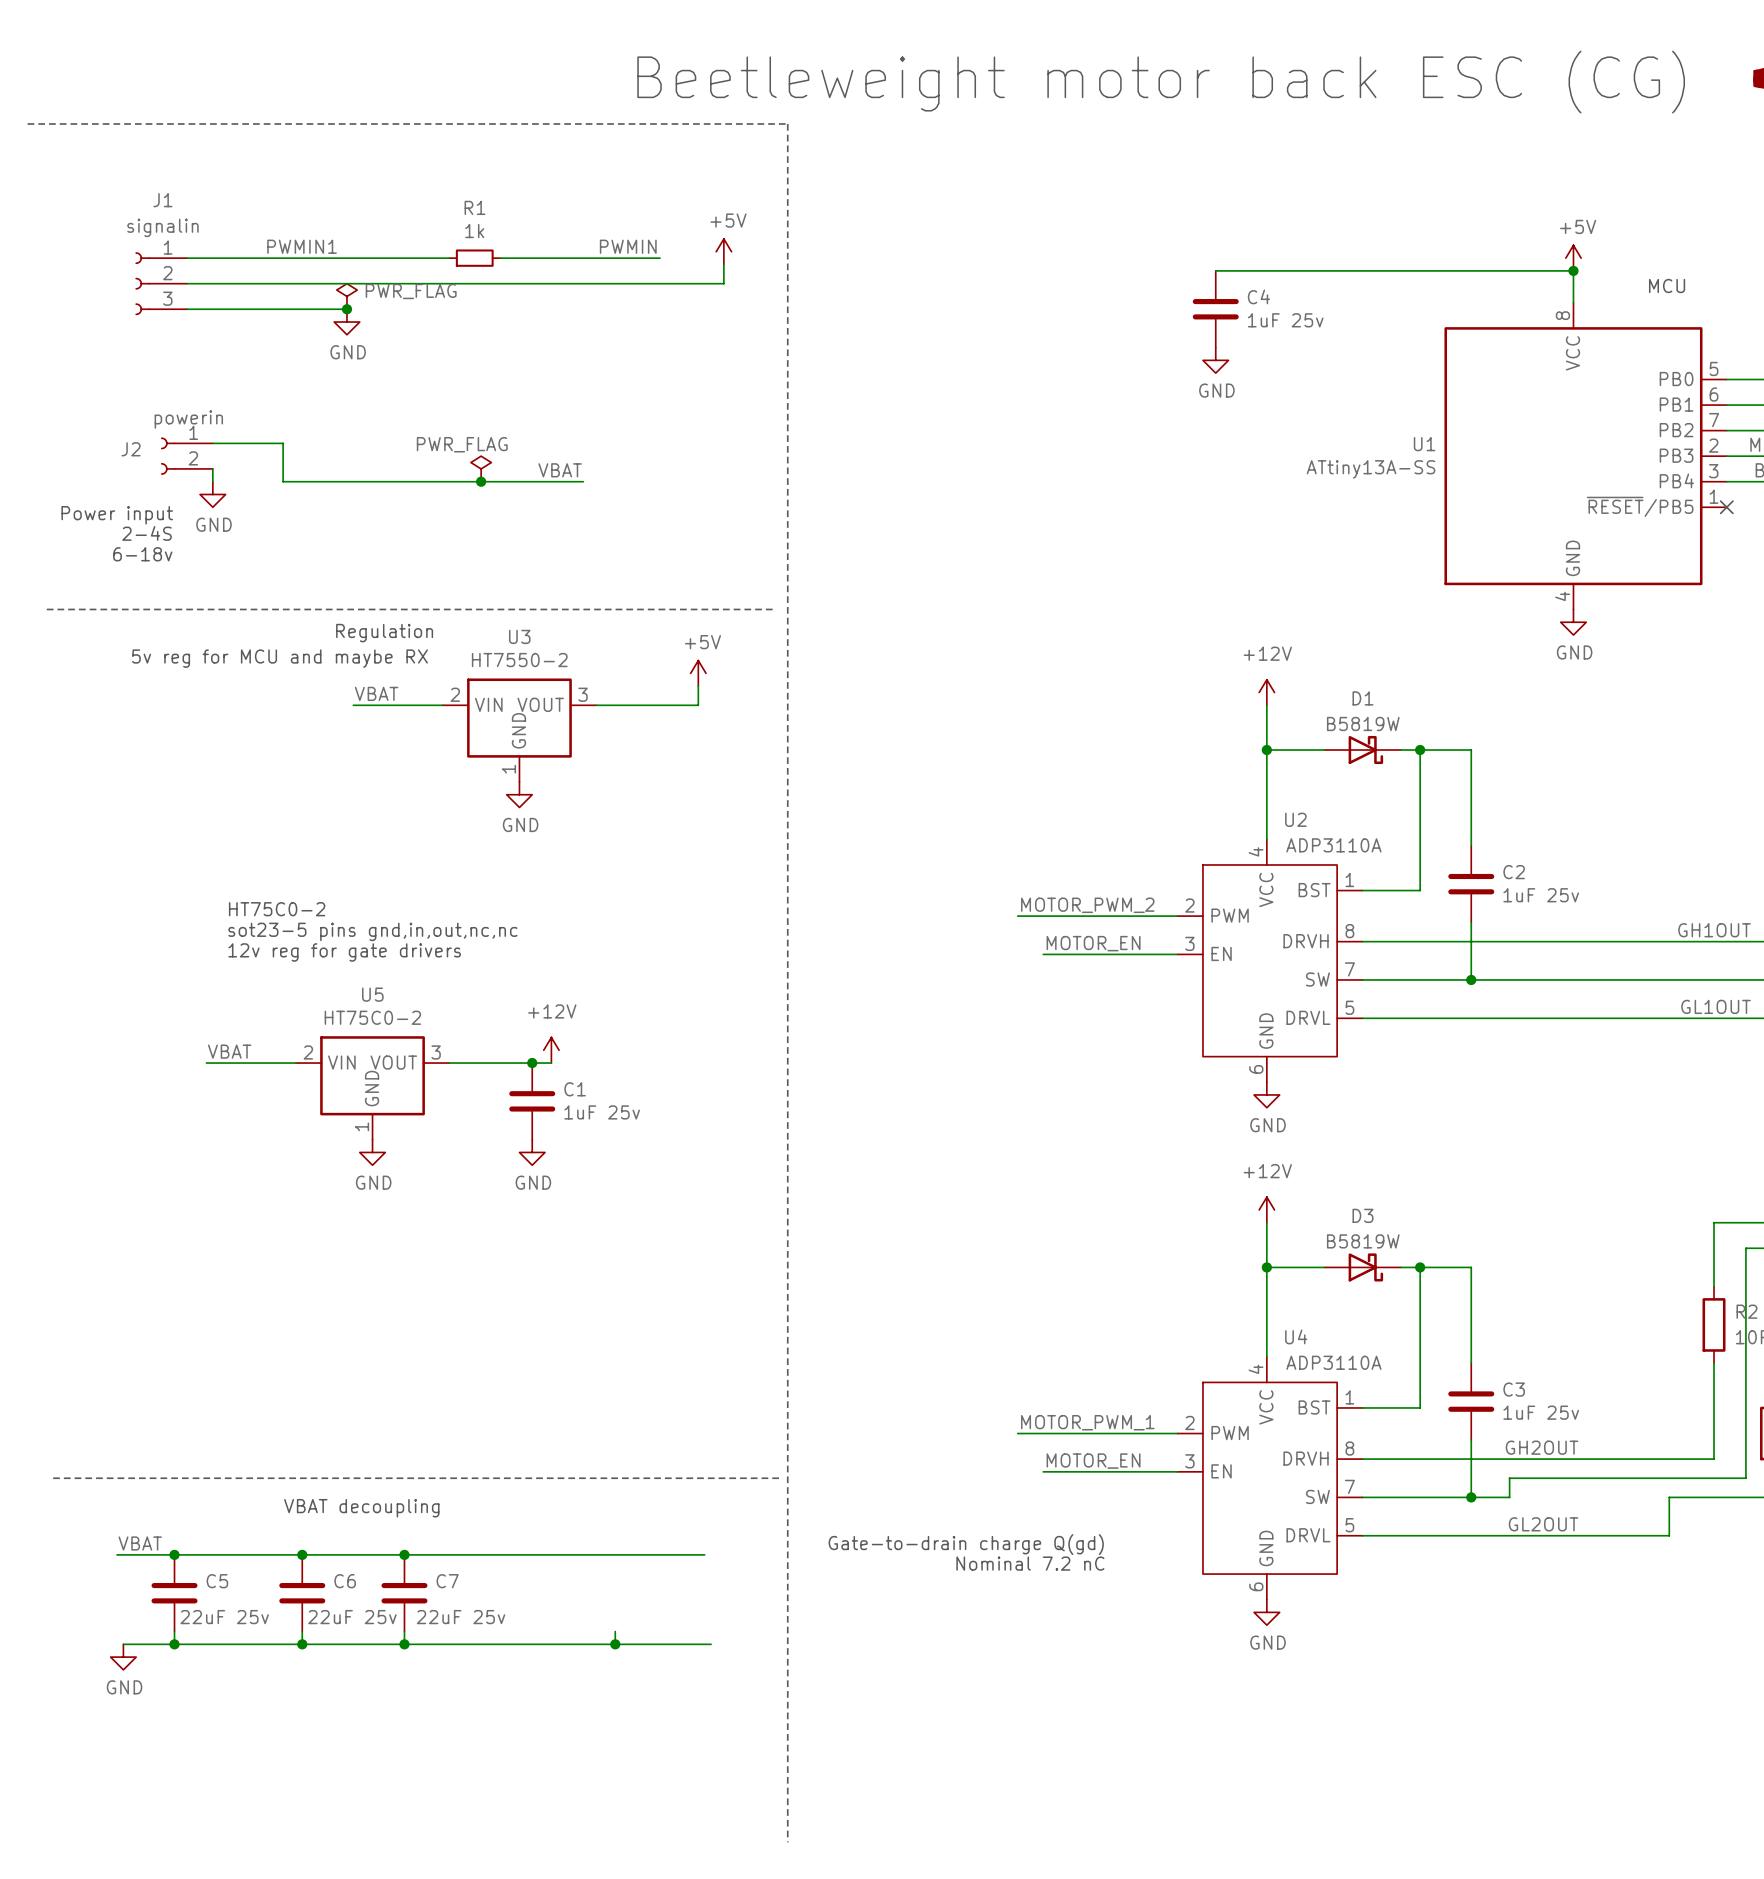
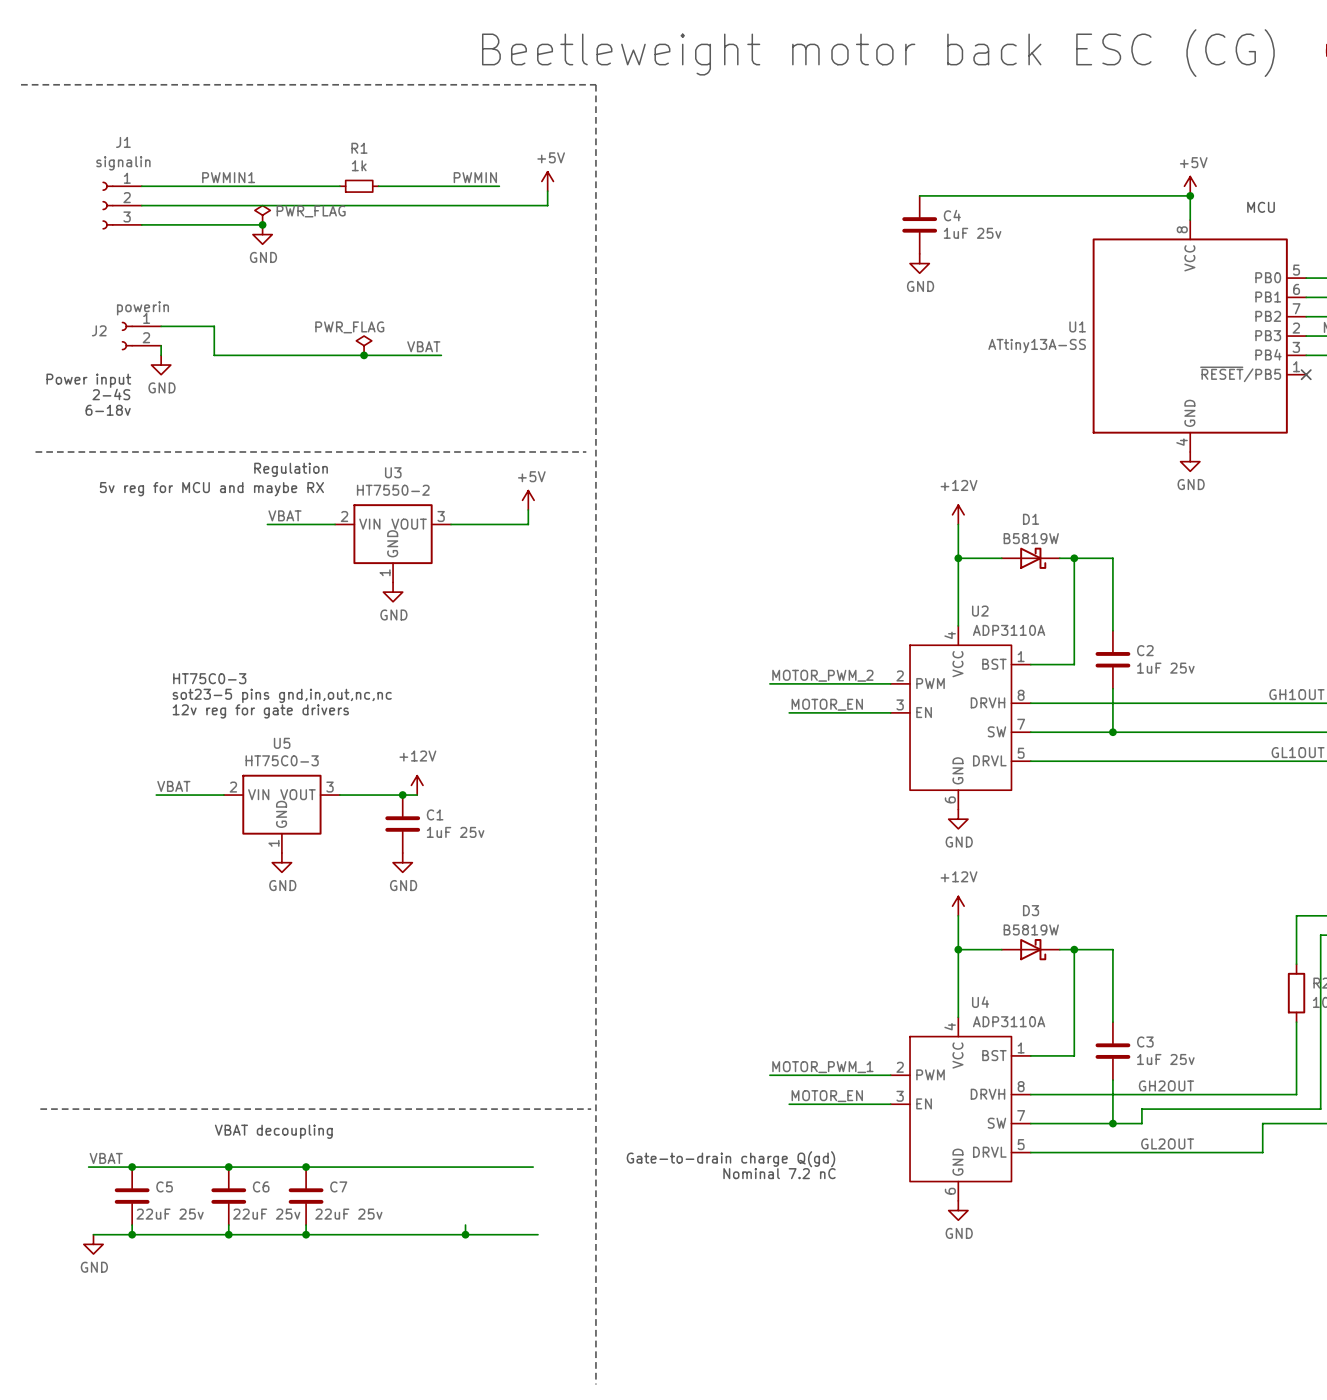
text: HT75C0-2 (277, 909) -> HT75C0-3 (209, 678)
U5 value: HT75C0-2 (372, 1017) -> HT75C0-3 (282, 760)

